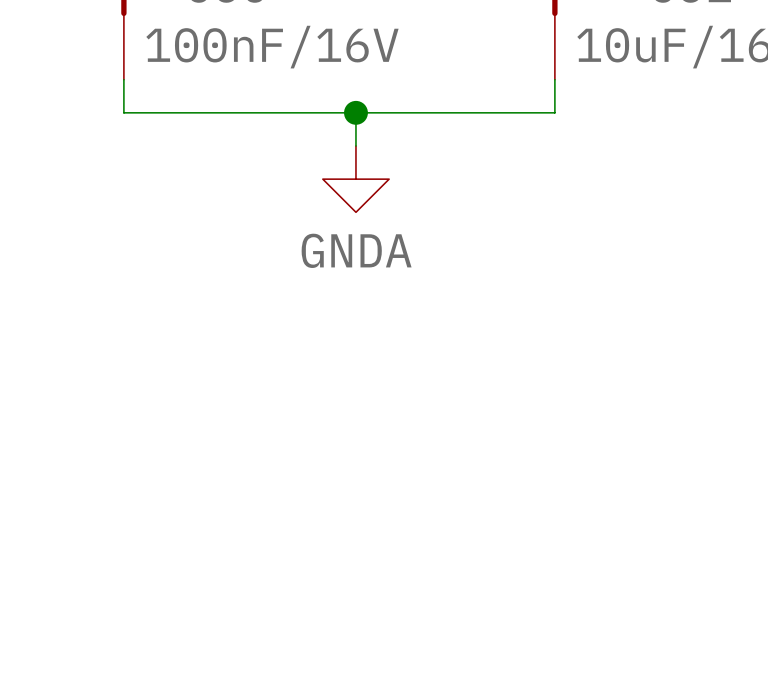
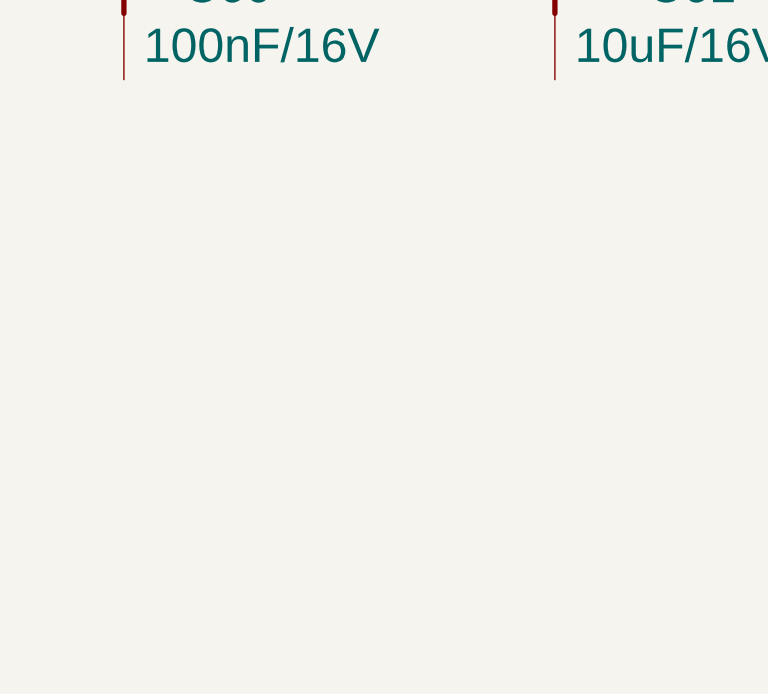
wire: (123, 79) (123, 112) (554, 112) (554, 79) -> none
wire: (355, 112) (355, 145) -> none
junction: (355, 112) -> none
power symbol: GNDA (355, 179) -> none

